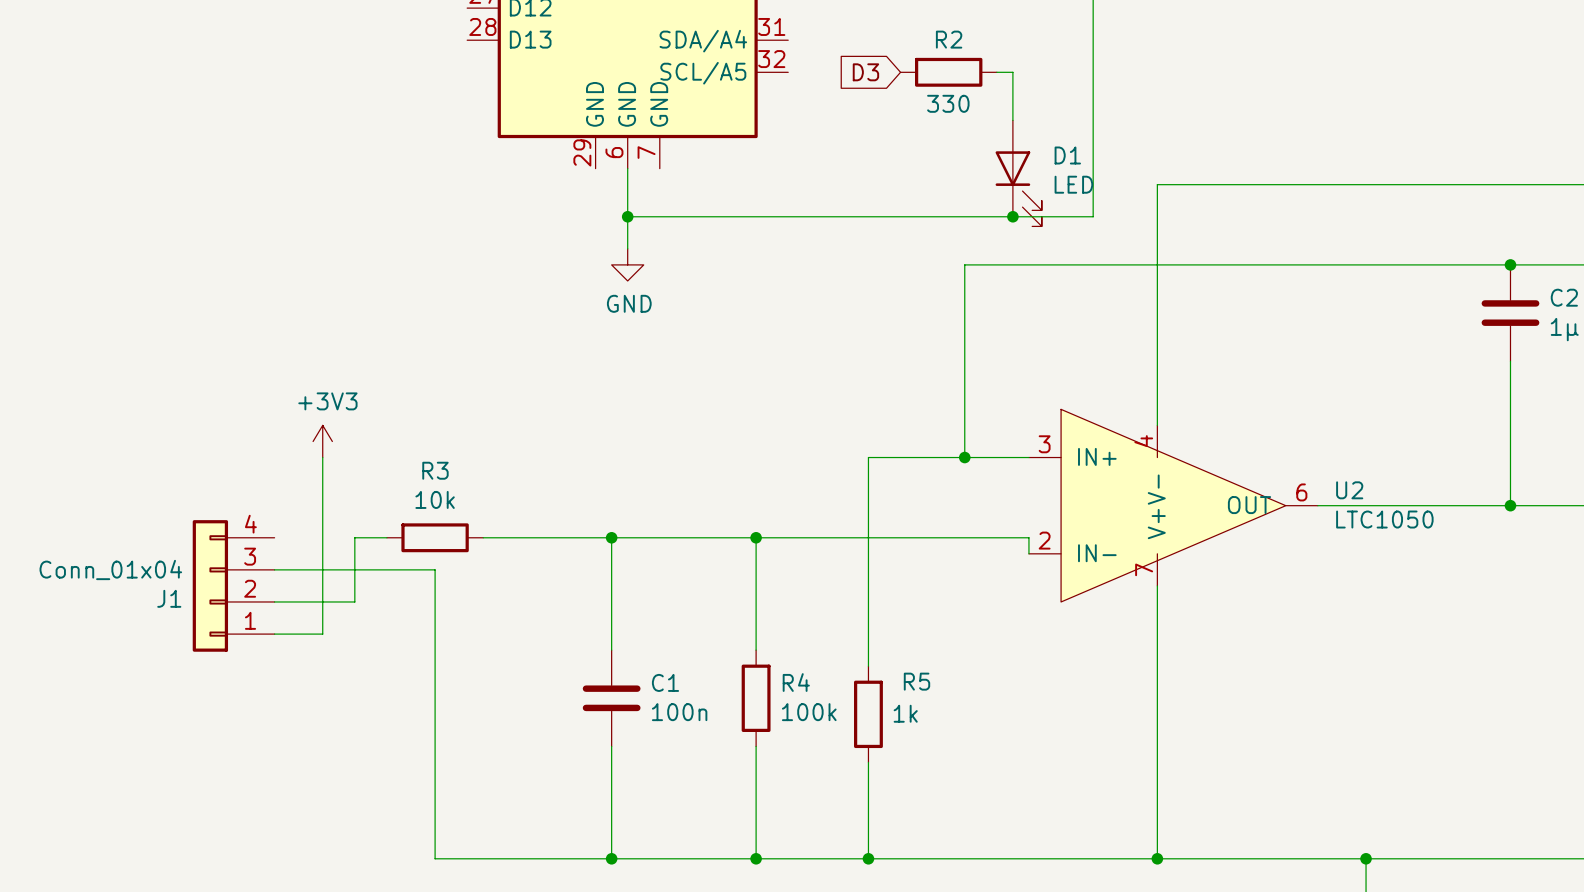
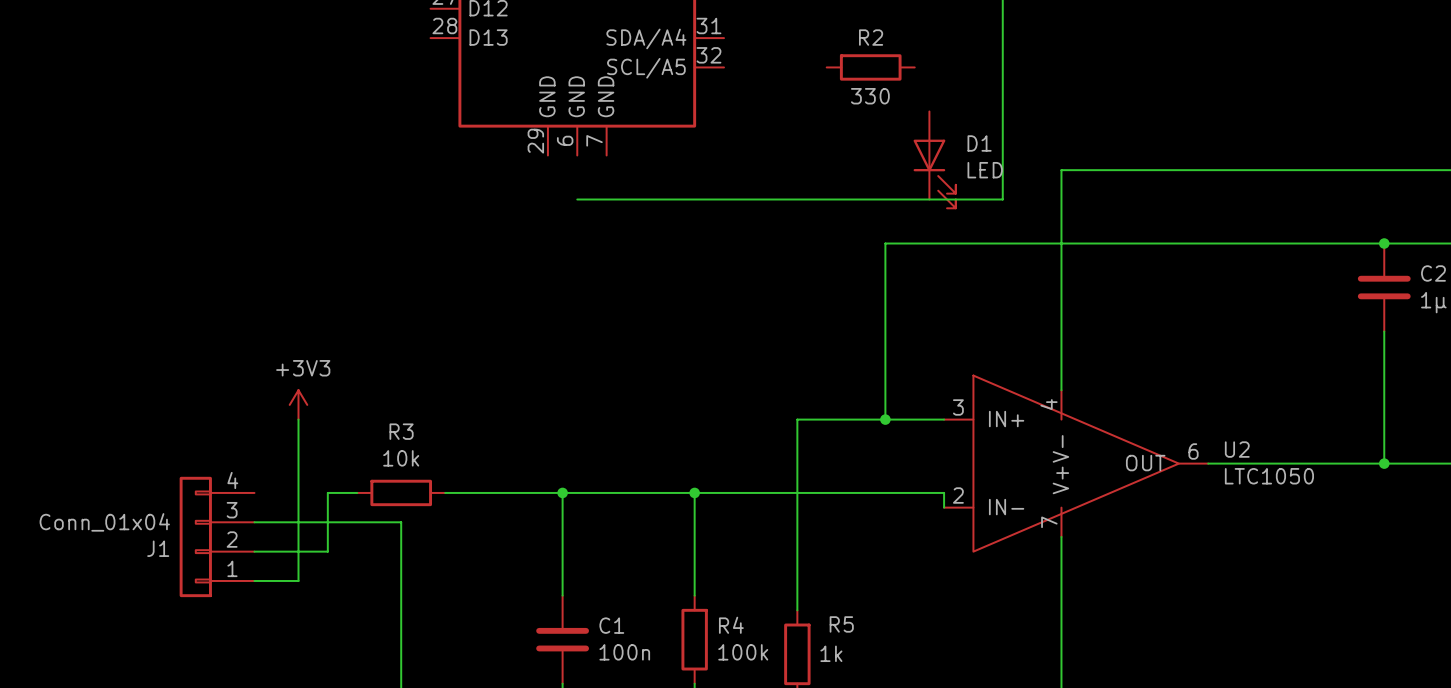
global label: D3 (865, 72) -> none
wire: (996, 72) (1012, 72) (1012, 120) -> none
wire: (627, 168) (627, 248) -> none
junction: (627, 216) -> none
junction: (1012, 216) -> none
power symbol: GND (627, 264) -> none

